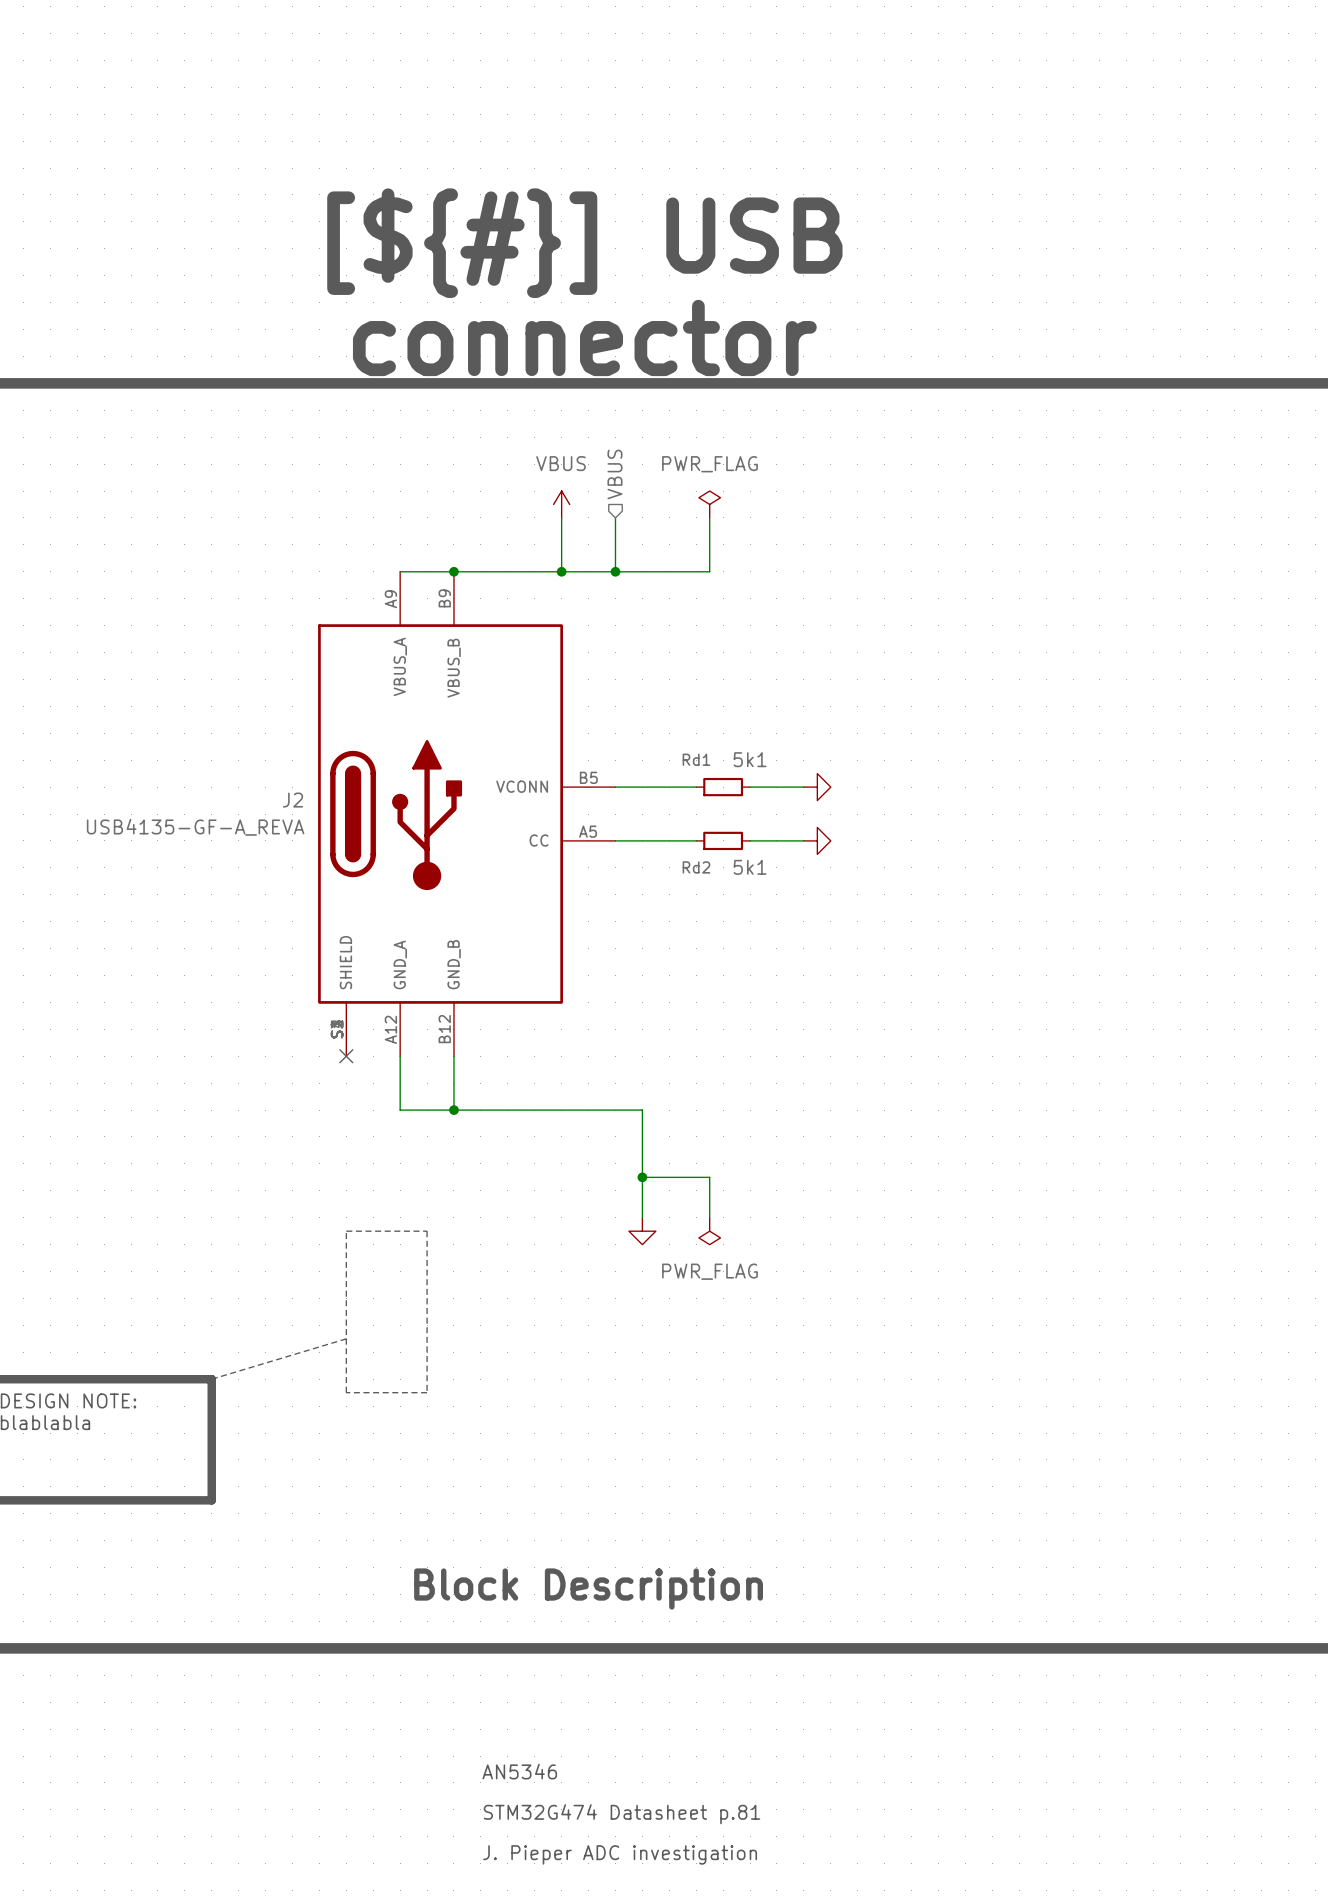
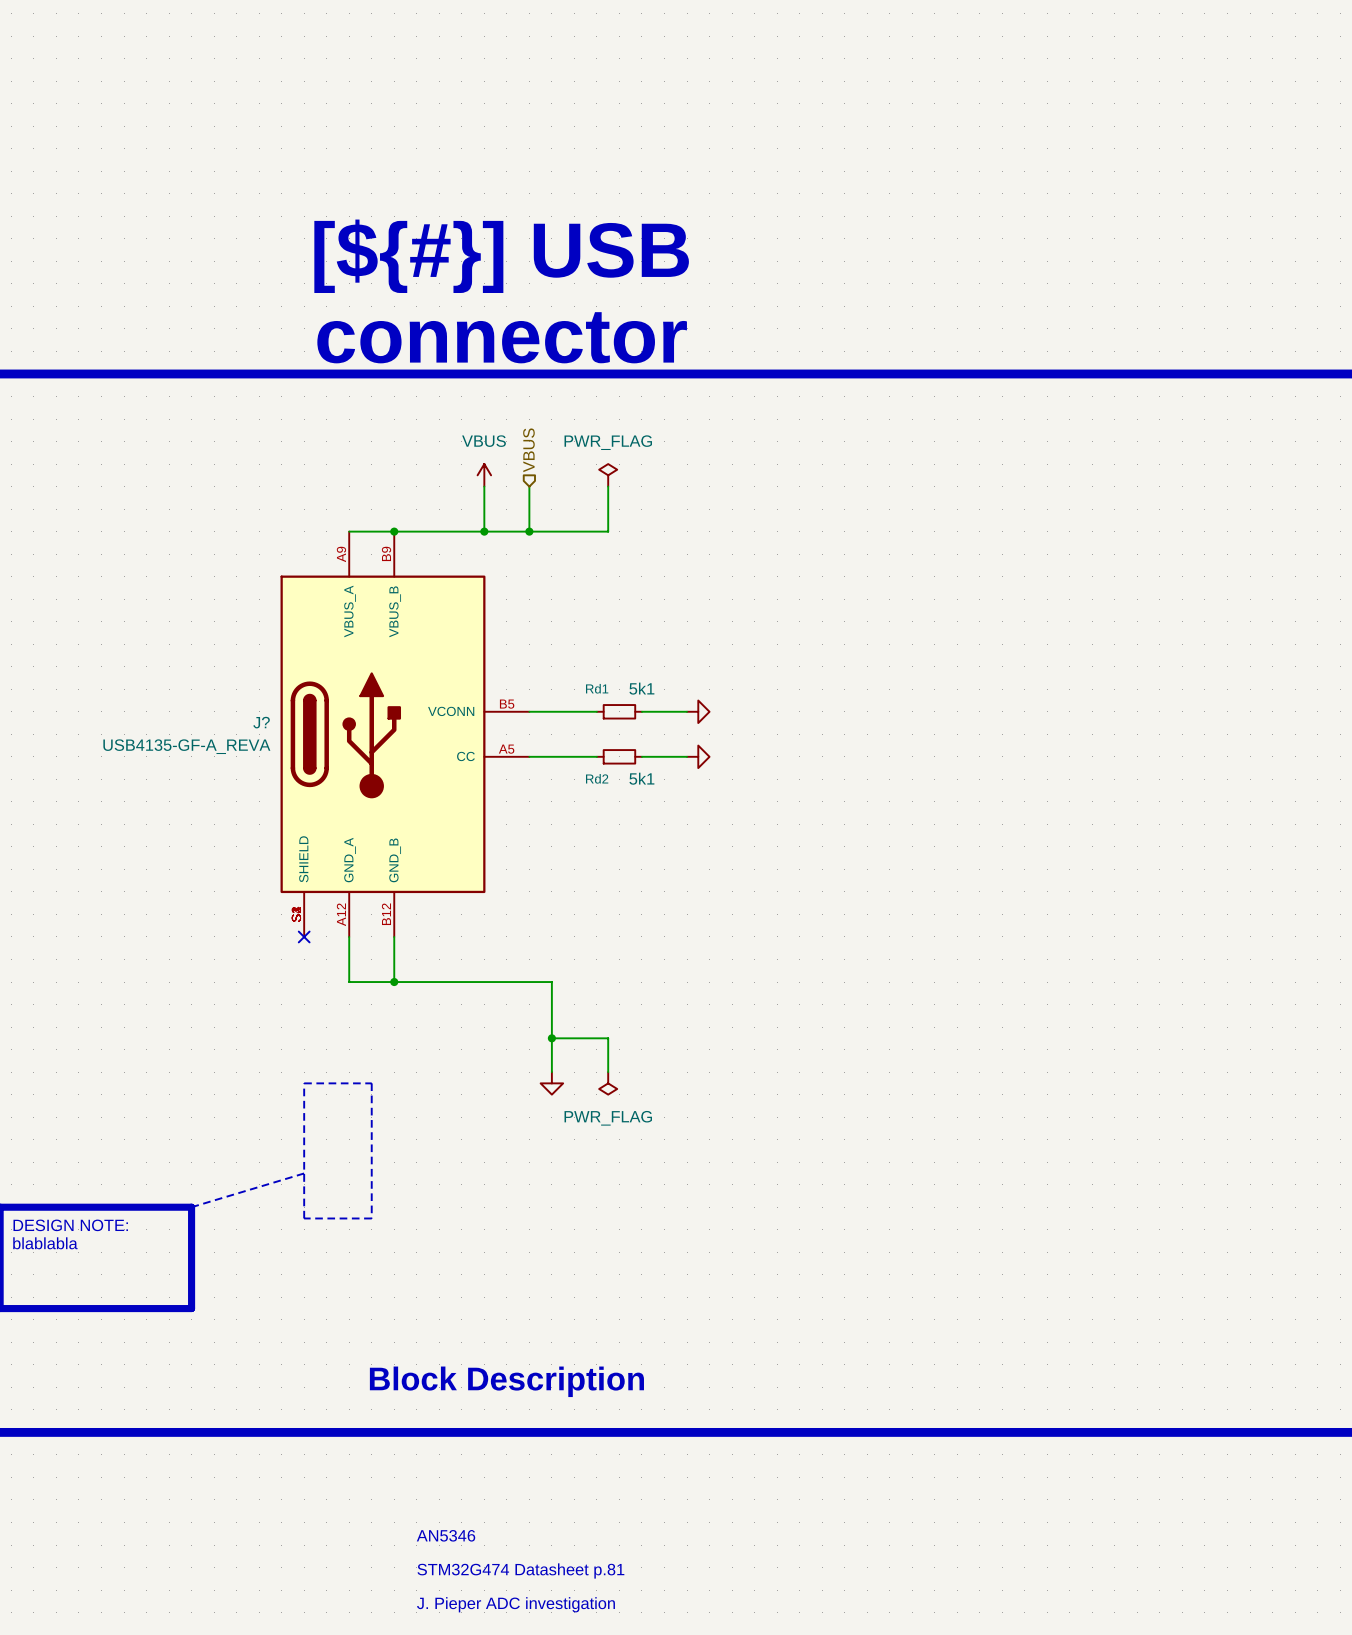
J2 name: J2 (293, 800) -> J? (261, 722)

